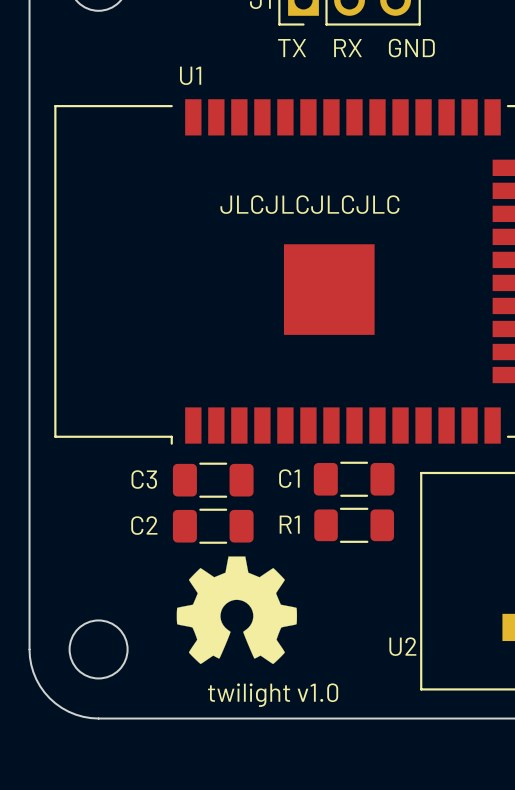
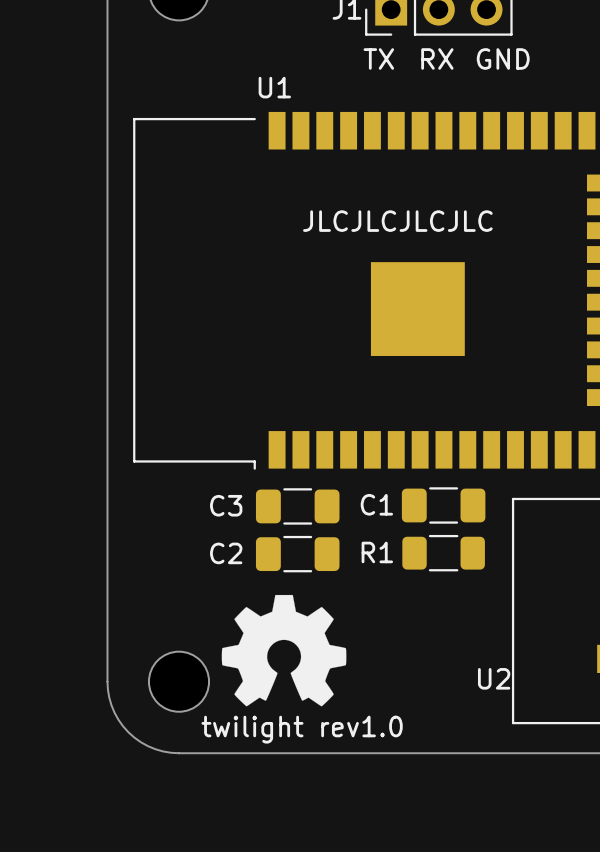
drawing position: (236, 610) -> (284, 650)
text: twilight v1.0 (273, 695) -> twilight rev1.0 (302, 729)

